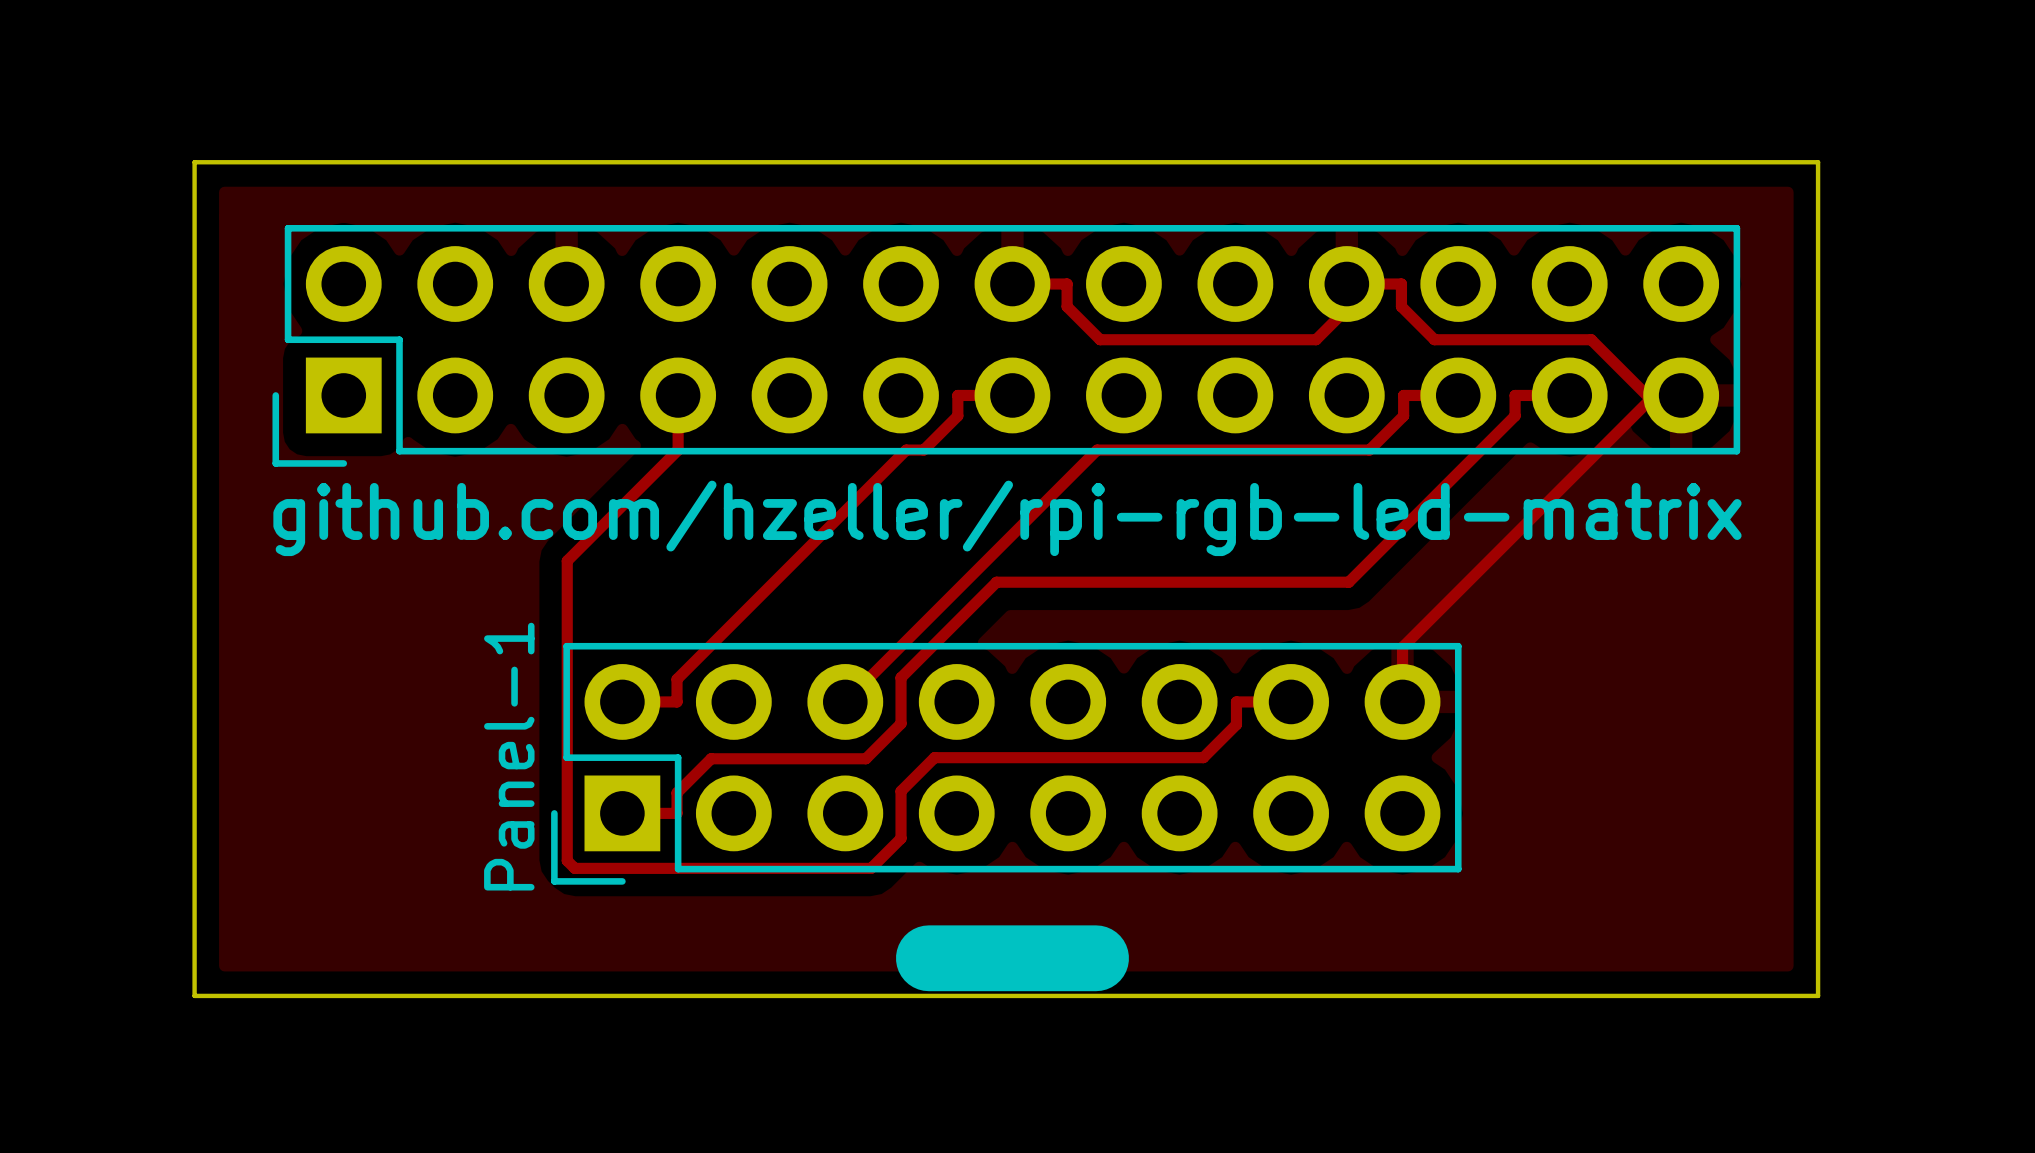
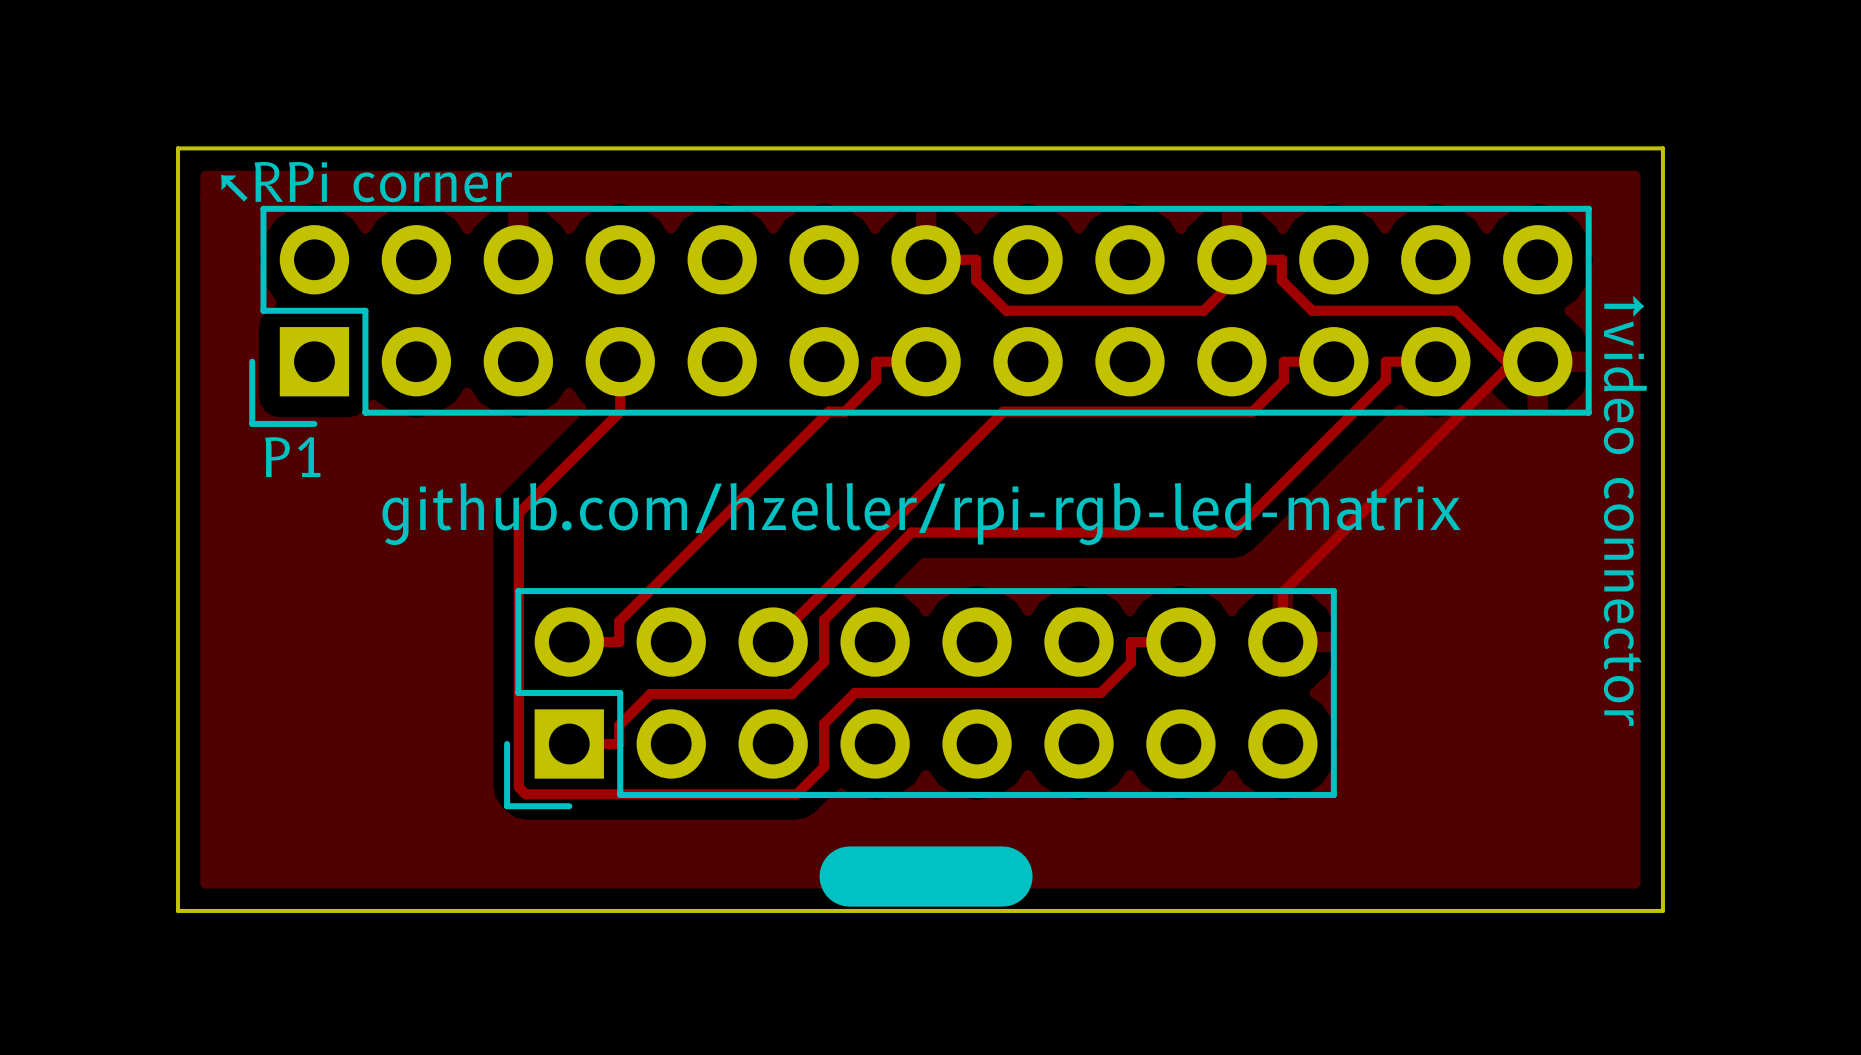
text: none -> ↖RPi corner (366, 182)
P1 name: none -> P1 (292, 457)
text position: github.com/hzeller/rpi-rgb-led-matrix (1007, 518) -> github.com/hzeller/rpi-rgb-led-matrix (921, 514)
text: none -> ↑video connector (1625, 510)
Panel-1 name: Panel-1 (509, 756) -> none

